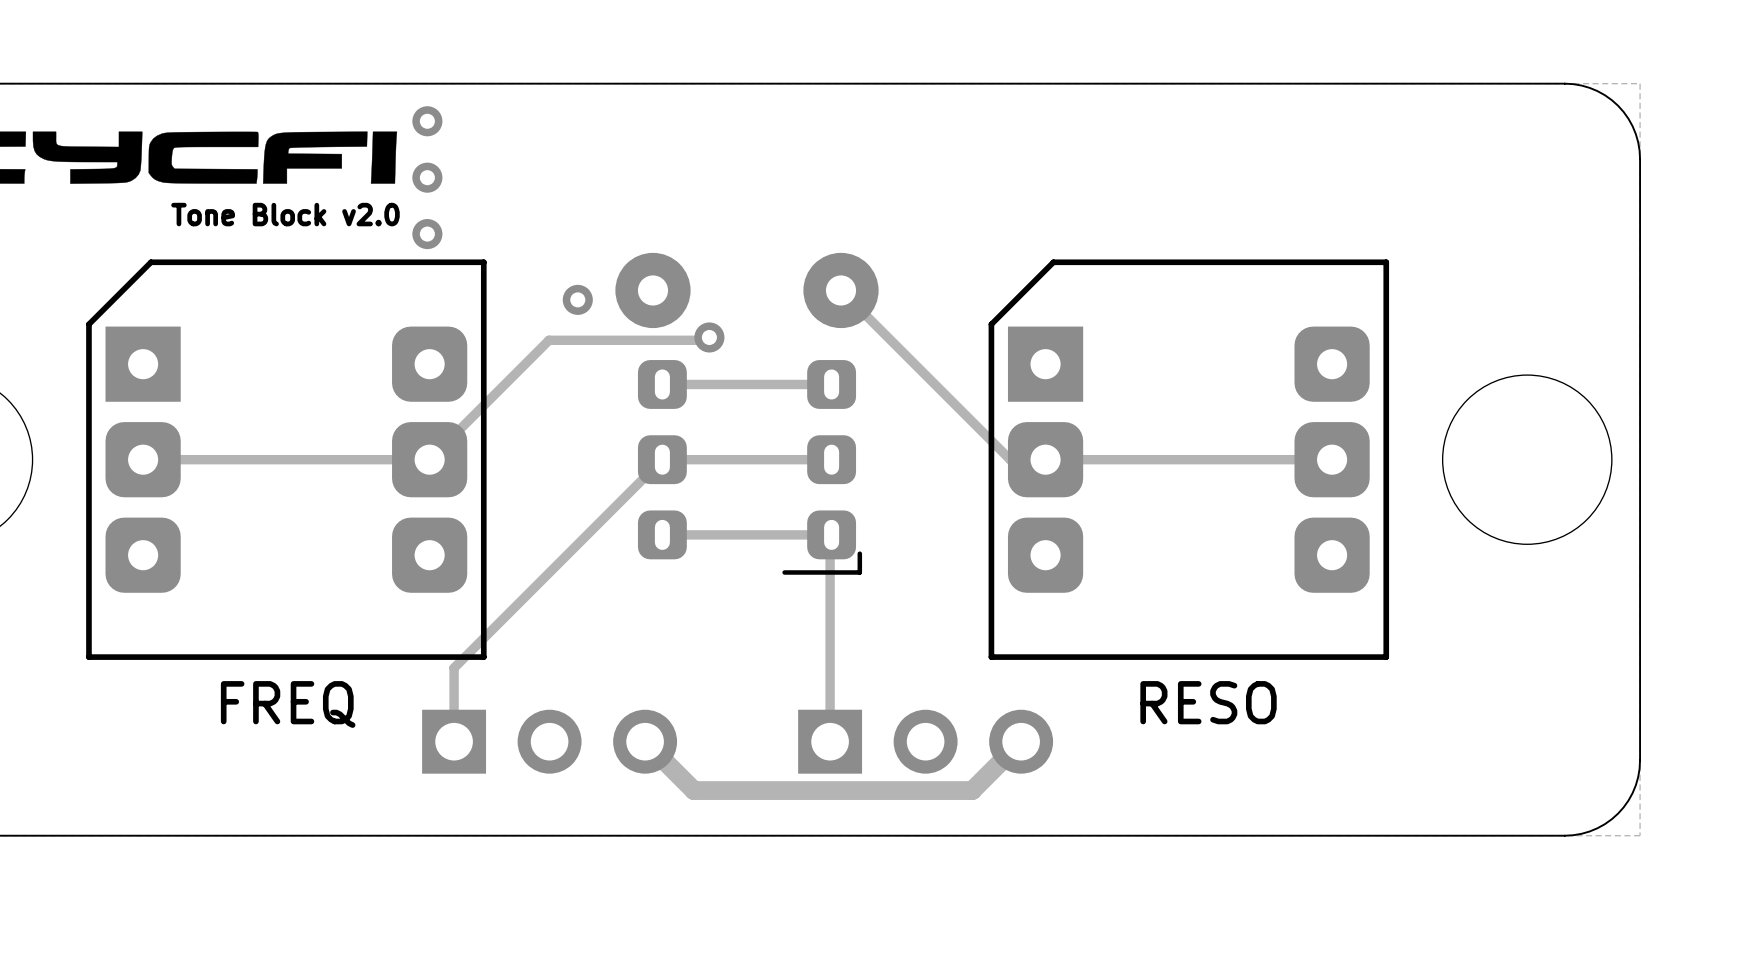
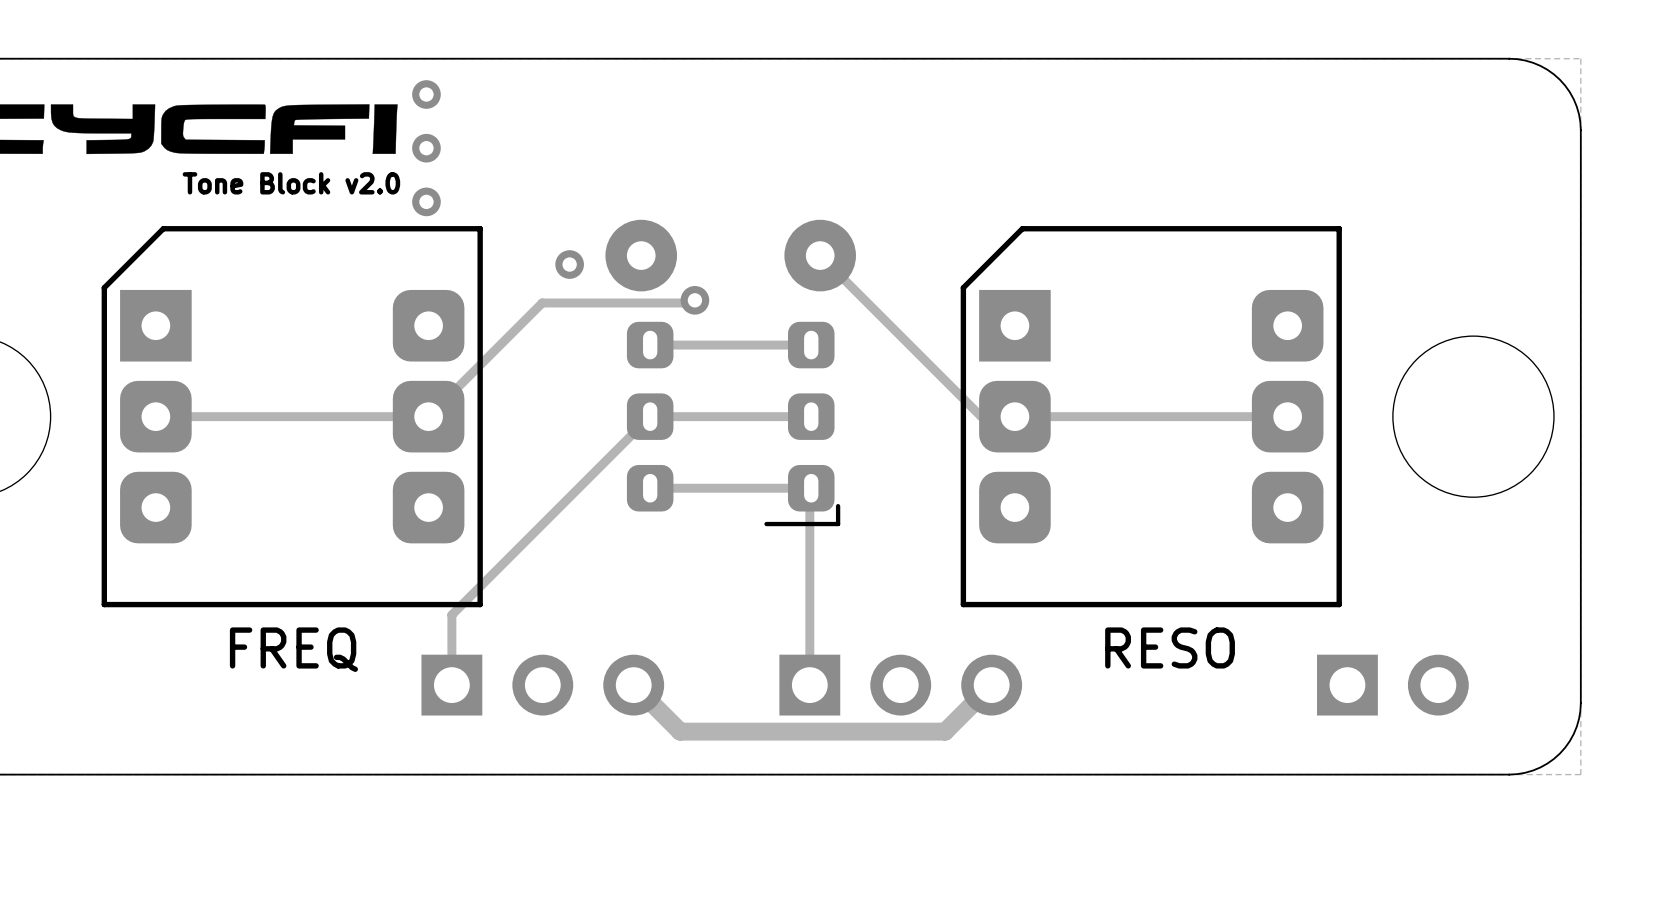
part: none -> (1392, 685)

